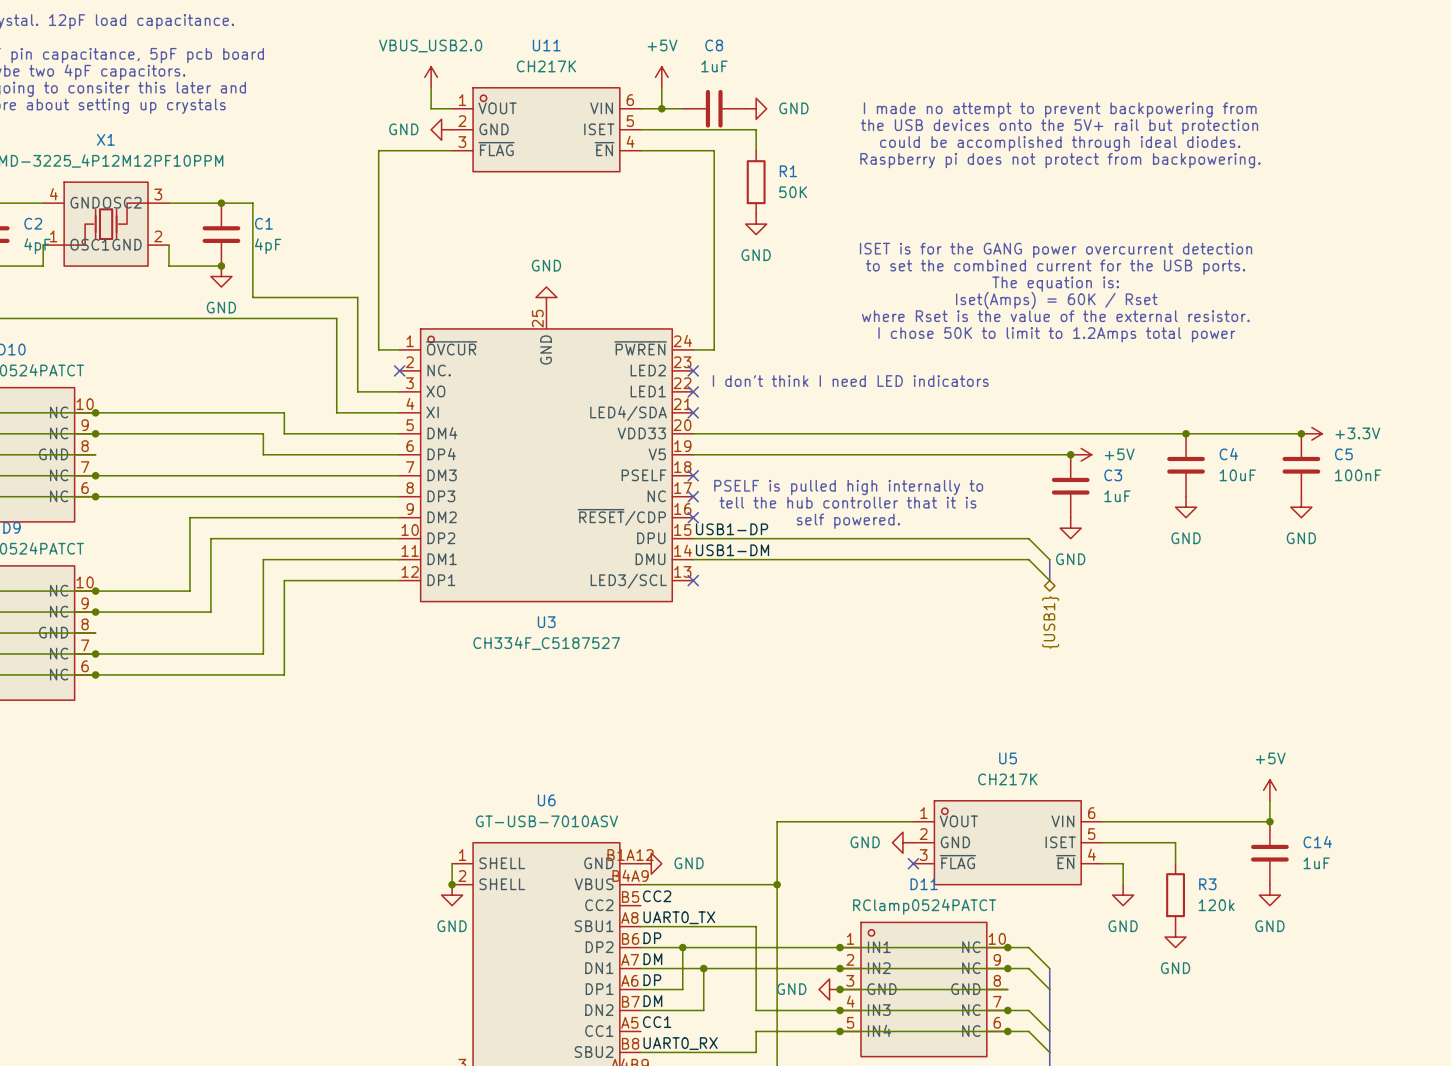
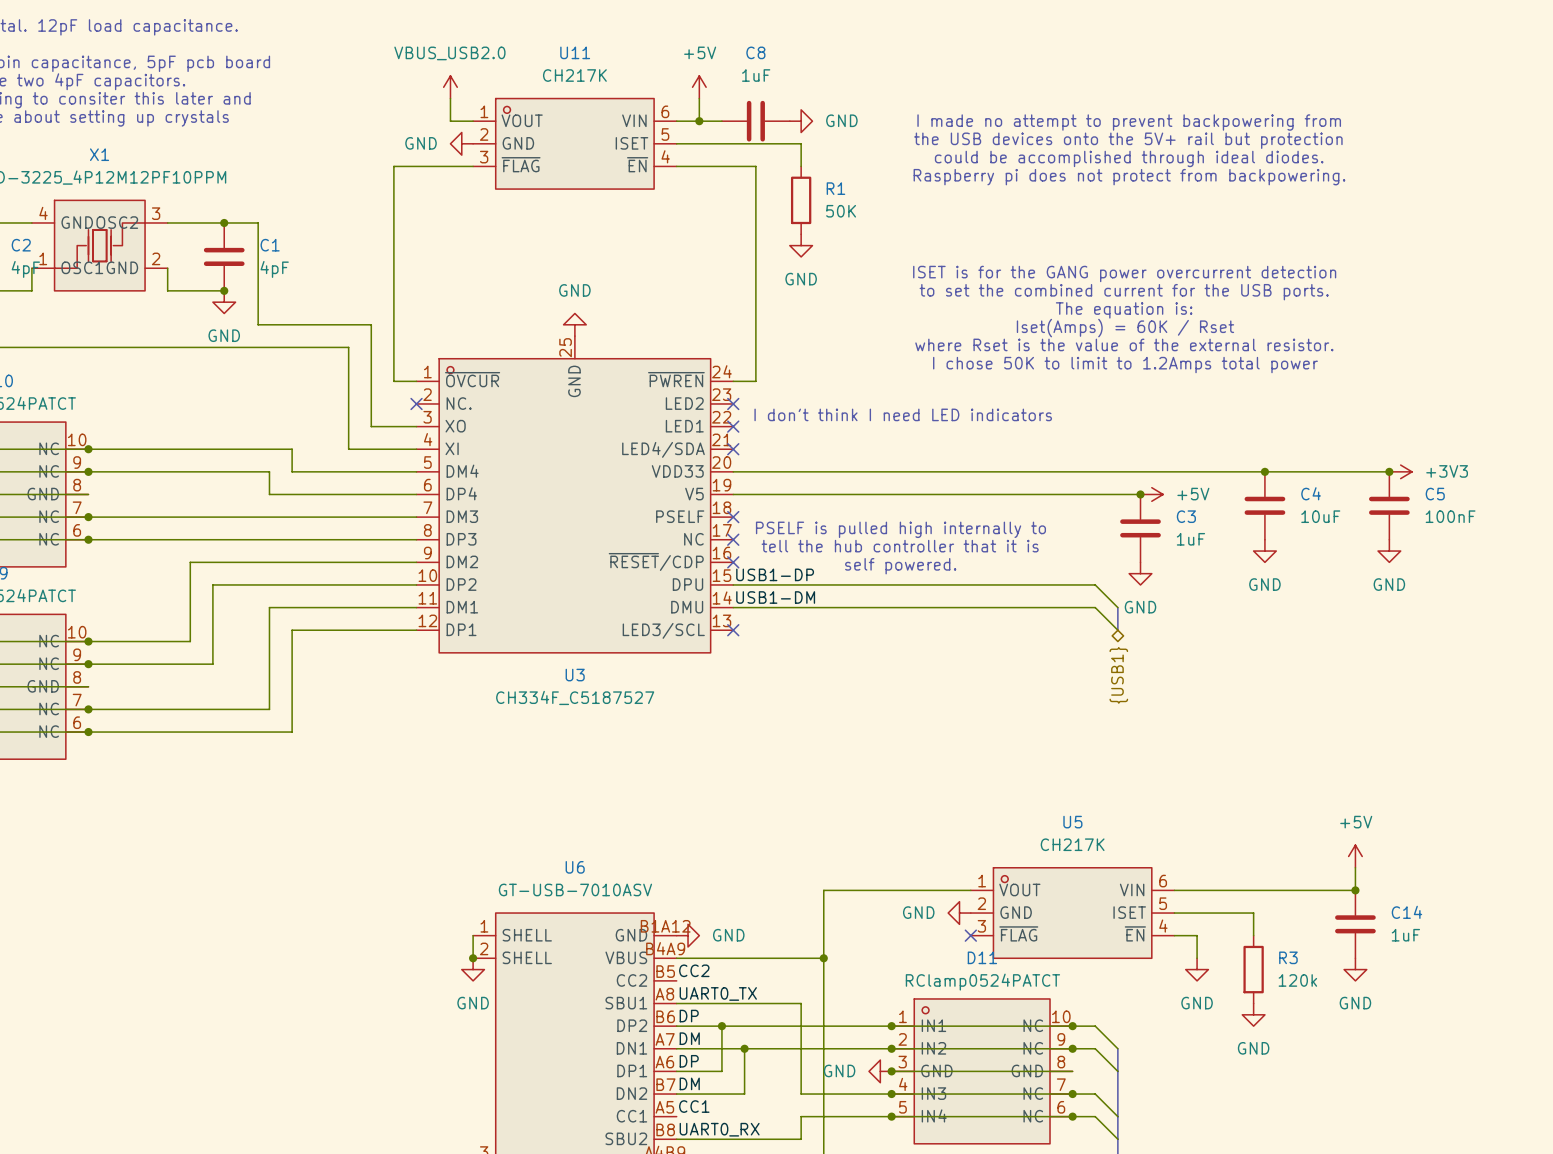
power symbol: +3.3V (1311, 433) -> +3V3 (1400, 471)

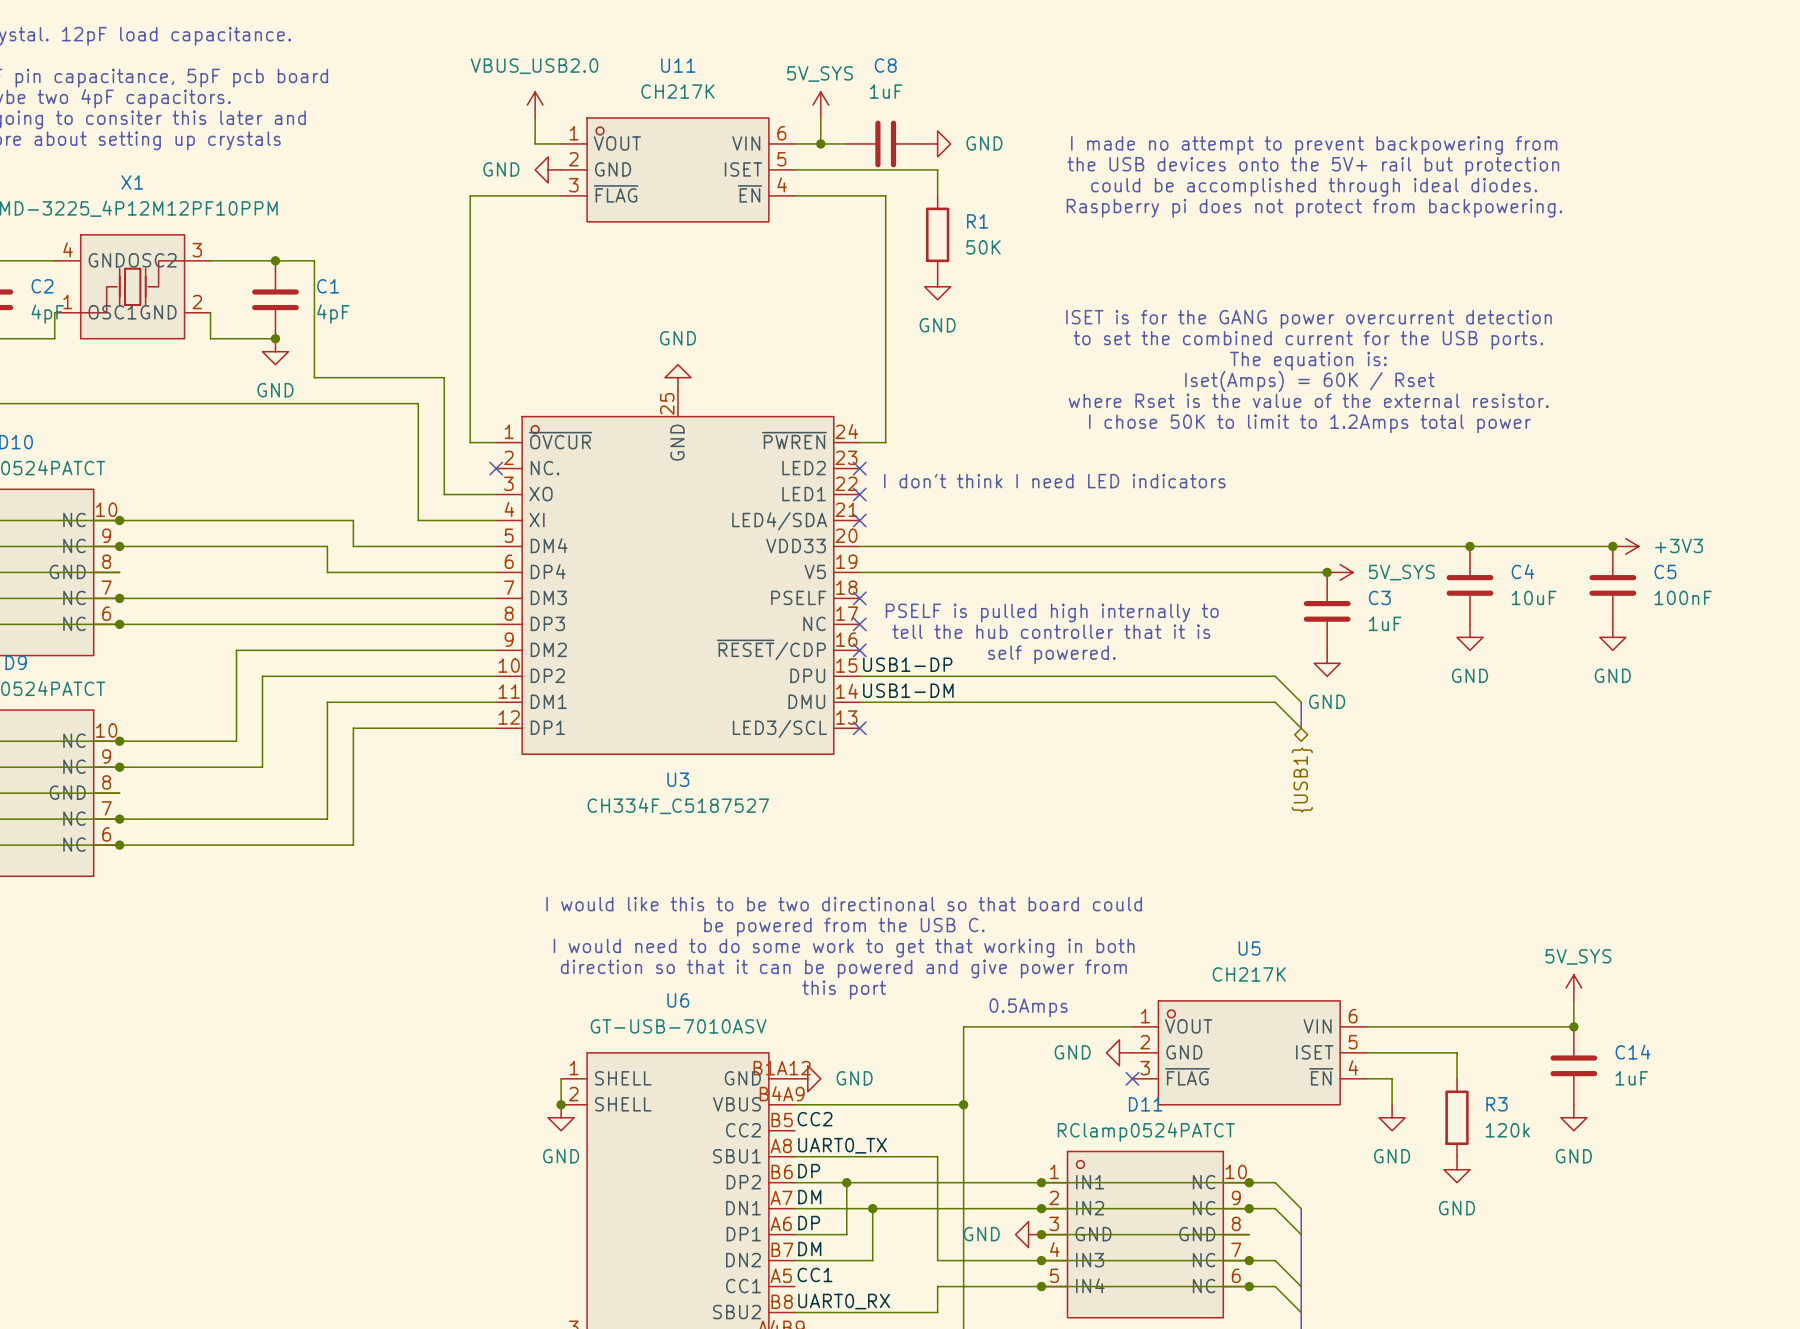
power symbol: +5V (699, 87) -> 5V_SYS (820, 105)
power symbol: +5V (1151, 494) -> 5V_SYS (1340, 572)
text: none -> I would like this to be two directinonal so that board could (844, 904)
text: none -> be powered from the USB C. (844, 927)
text: none -> I would need to do some work to get that working in both (844, 948)
text: none -> direction so that it can be powered and give power from (843, 969)
power symbol: +5V (1355, 856) -> 5V_SYS (1573, 987)
text: none -> this port (844, 989)
text: none -> 0.5Amps (1028, 1007)

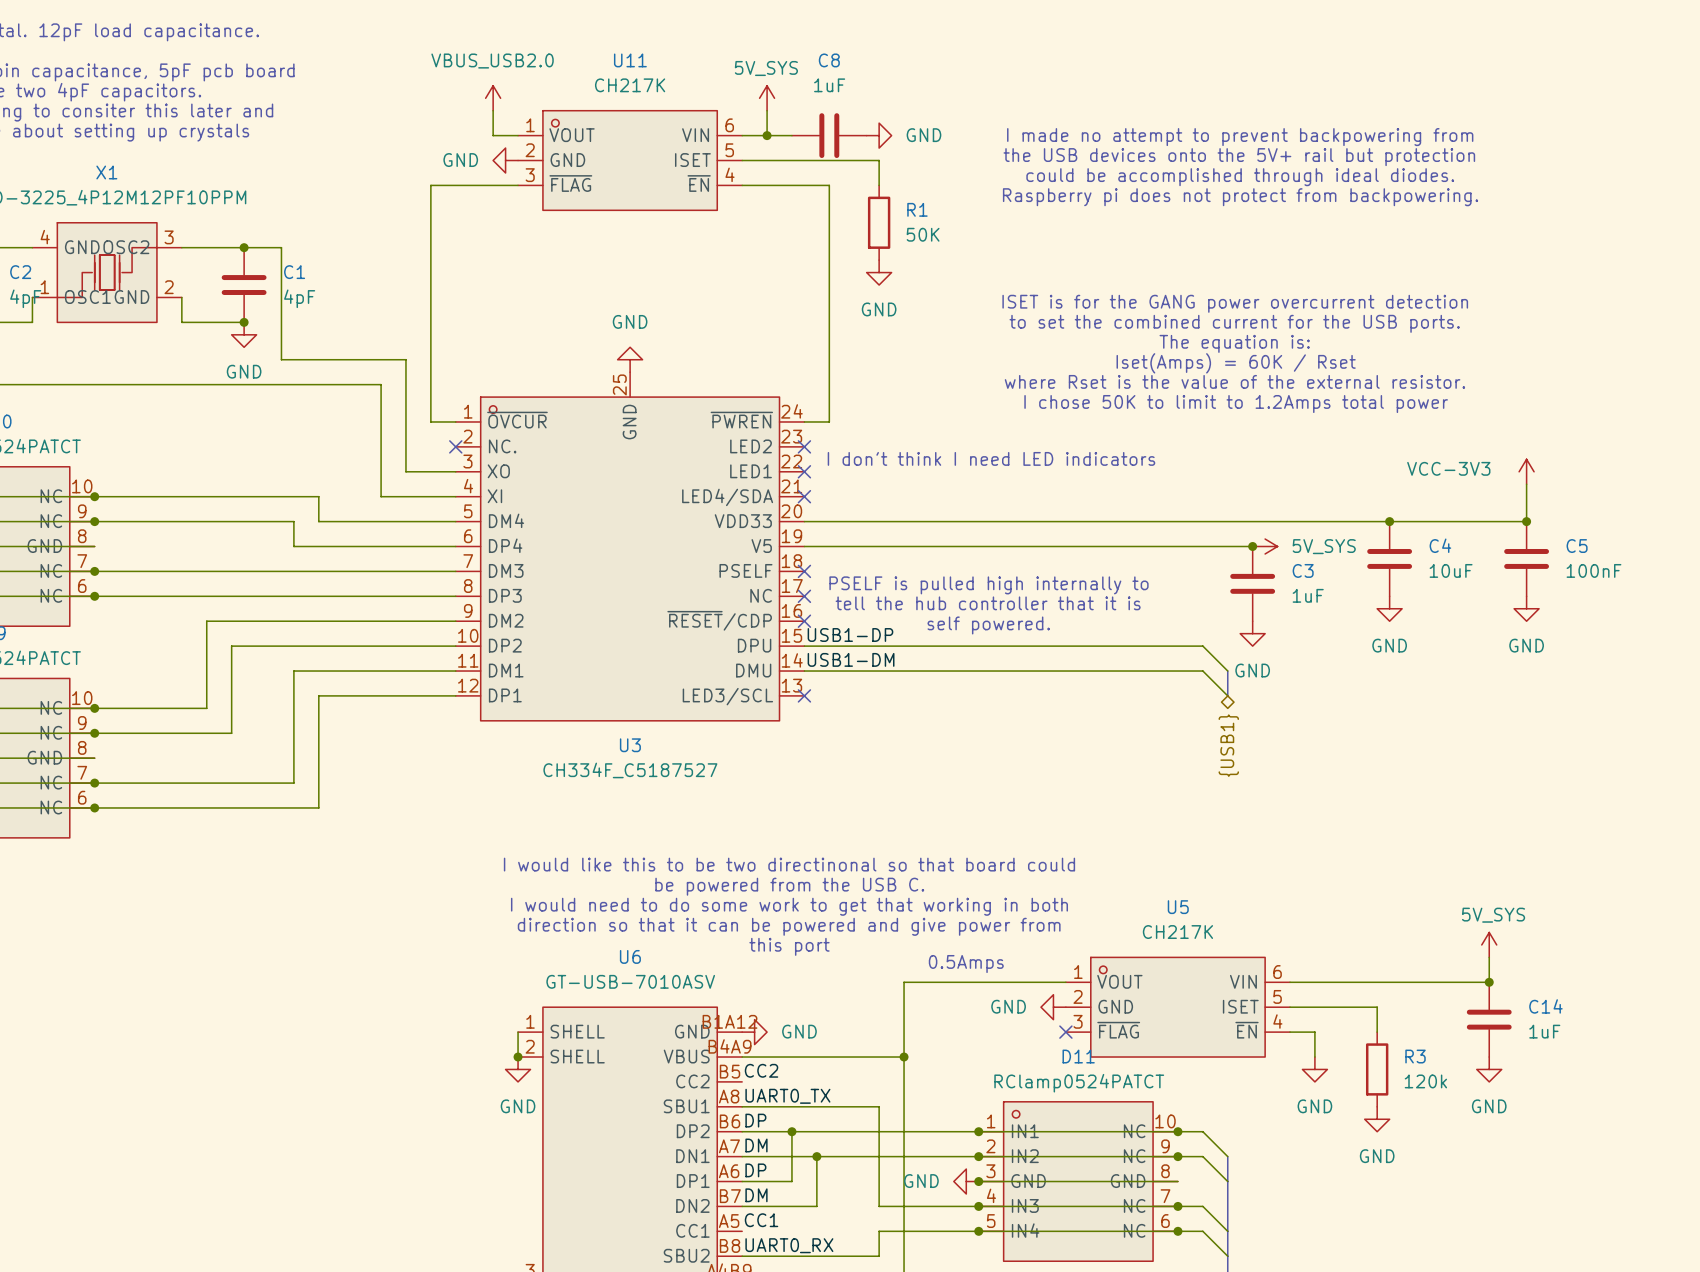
power symbol: none -> VCC-3V3 (1526, 471)
wire: none -> (1526, 484) (1526, 521)
power symbol: +3V3 (1625, 546) -> none

